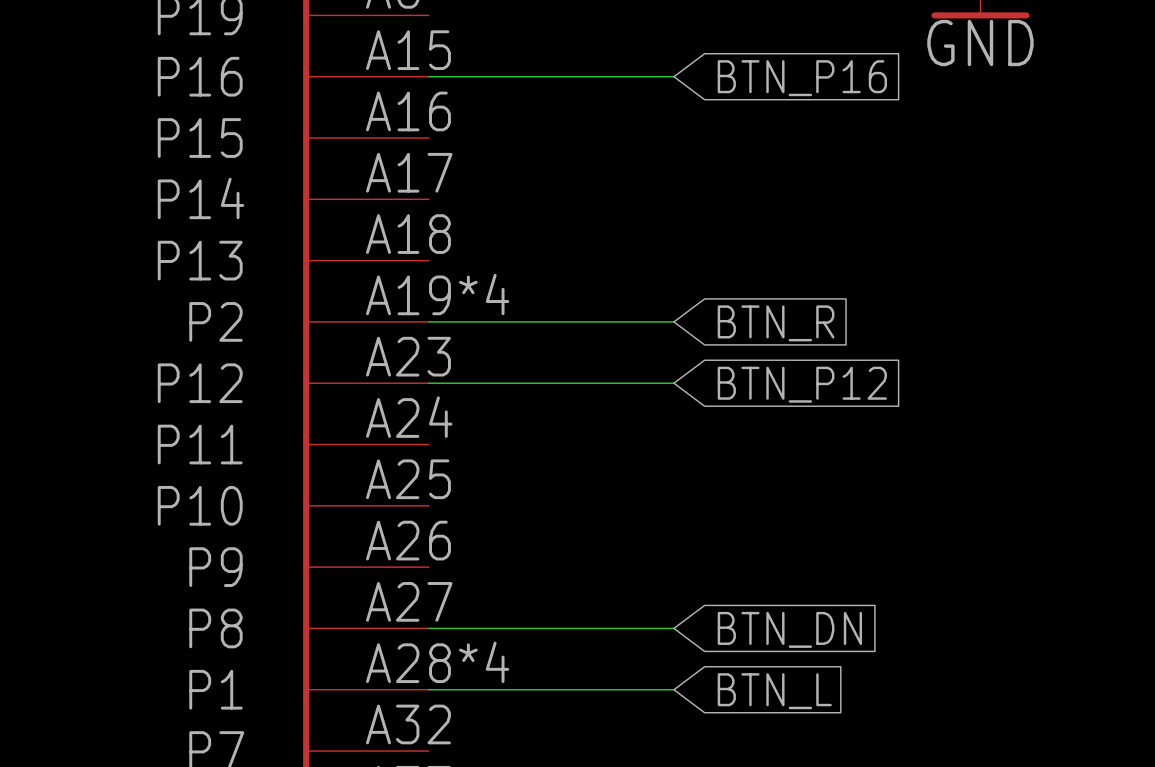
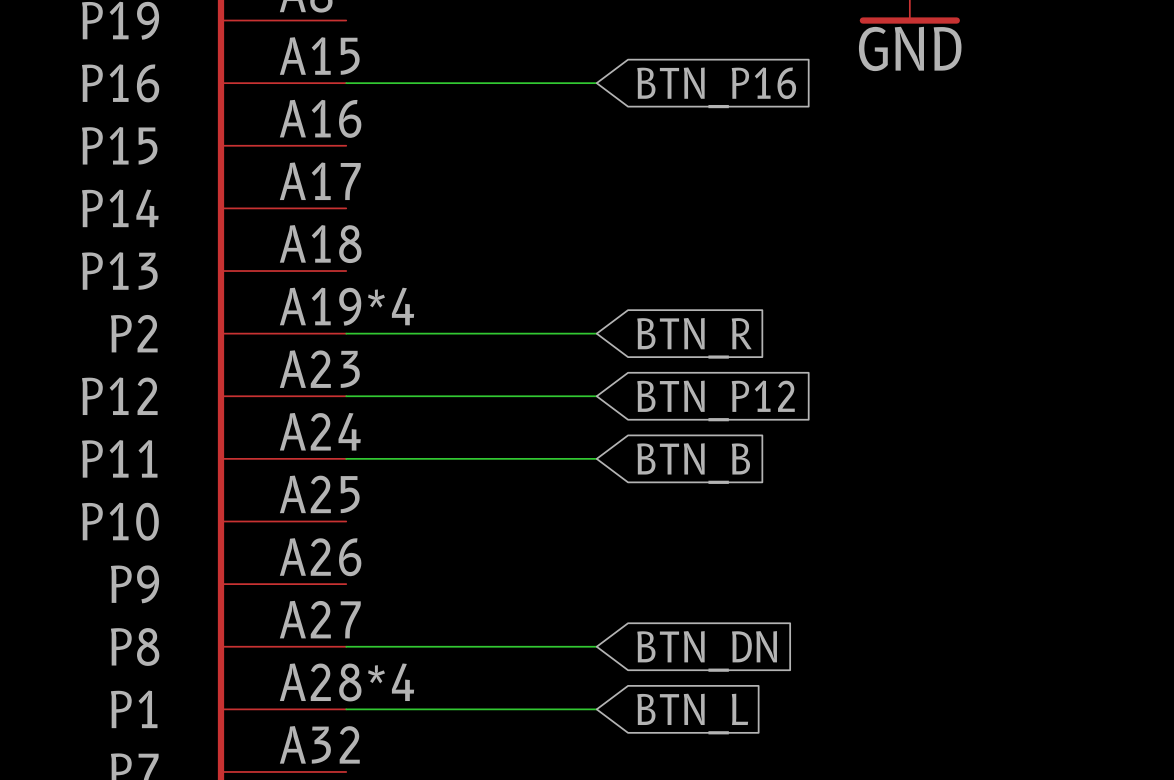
wire: none -> (346, 458) (596, 458)
global label: none -> BTN_B (693, 463)

